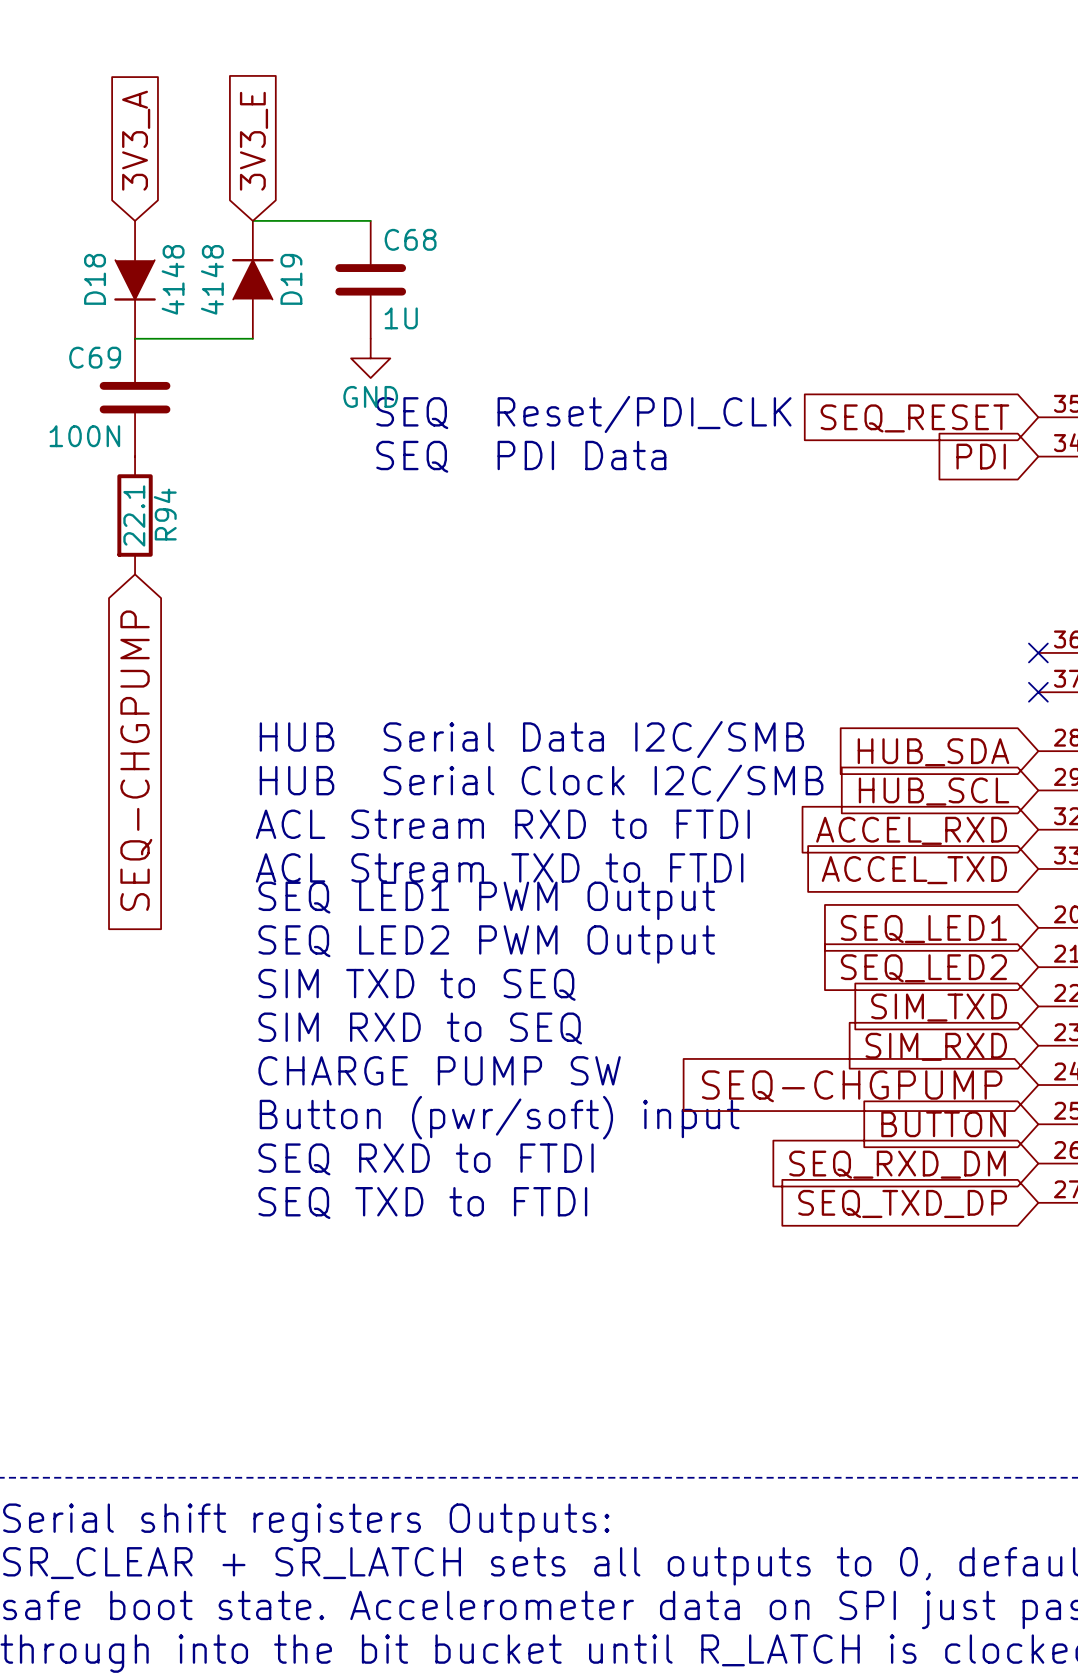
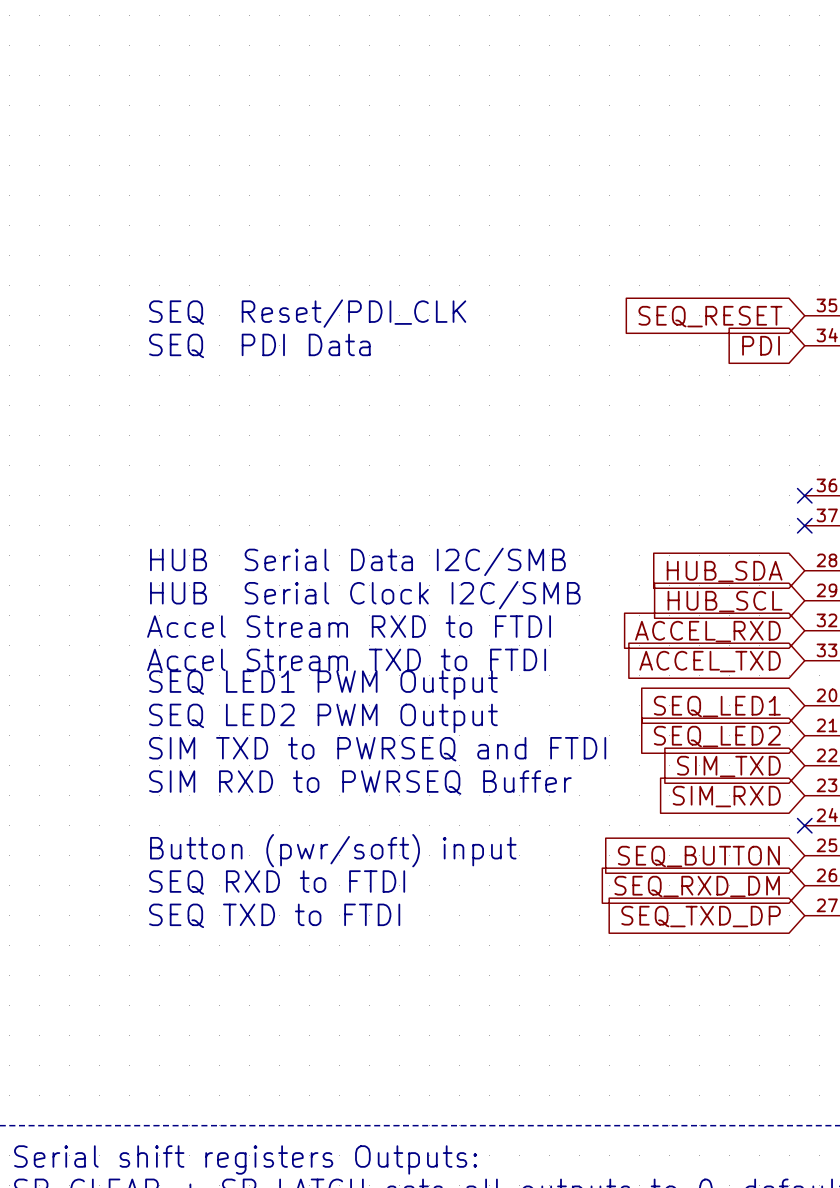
global label: 3V3_A (136, 140) -> none
global label: 3V3_E (253, 141) -> none
wire: (252, 220) (370, 220) -> none
D18: 4148 (135, 279) -> none
D19: 4148 (252, 279) -> none
C68: 1U (370, 279) -> none
wire: (135, 338) (252, 338) -> none
power symbol: GND (370, 358) -> none
C69: 100N (135, 397) -> none
text position: SEQ Reset/PDI_CLK (583, 414) -> SEQ Reset/PDI_CLK (307, 313)
text position: SEQ PDI Data (521, 456) -> SEQ PDI Data (259, 345)
R94: 22.1 (135, 515) -> none
text position: HUB Serial Data I2C/SMB (531, 739) -> HUB Serial Data I2C/SMB (357, 561)
global label: SEQ-CHGPUMP (136, 760) -> none
text position: HUB Serial Clock I2C/SMB (541, 783) -> HUB Serial Clock I2C/SMB (365, 595)
text: none -> Accel Stream RXD to FTDI (349, 626)
text: ACL Stream RXD to FTDI (502, 824) -> none
text: none -> Accel Stream TXD to FTDI (346, 659)
text: ACL Stream TXD to FTDI (499, 867) -> none
text position: SEQ LED1 PWM Output (486, 900) -> SEQ LED1 PWM Output (323, 685)
text position: SEQ LED2 PWM Output (486, 944) -> SEQ LED2 PWM Output (323, 718)
text: SIM TXD to SEQ (417, 984) -> none
text: none -> SIM TXD to PWRSEQ and FTDI (377, 749)
text: SIM RXD to SEQ (420, 1028) -> none
text: none -> SIM RXD to PWRSEQ Buffer (360, 782)
text: CHARGE PUMP SW (439, 1070) -> none
no-connect mark: none -> (804, 825)
global label: SEQ-CHGPUMP (852, 1086) -> none
text position: Button (pwr/soft) input (499, 1117) -> Button (pwr/soft) input (333, 850)
global label: BUTTON (943, 1124) -> SEQ_BUTTON (698, 856)
text position: SEQ RXD to FTDI (426, 1159) -> SEQ RXD to FTDI (277, 882)
text position: SEQ TXD to FTDI (422, 1203) -> SEQ TXD to FTDI (274, 915)

